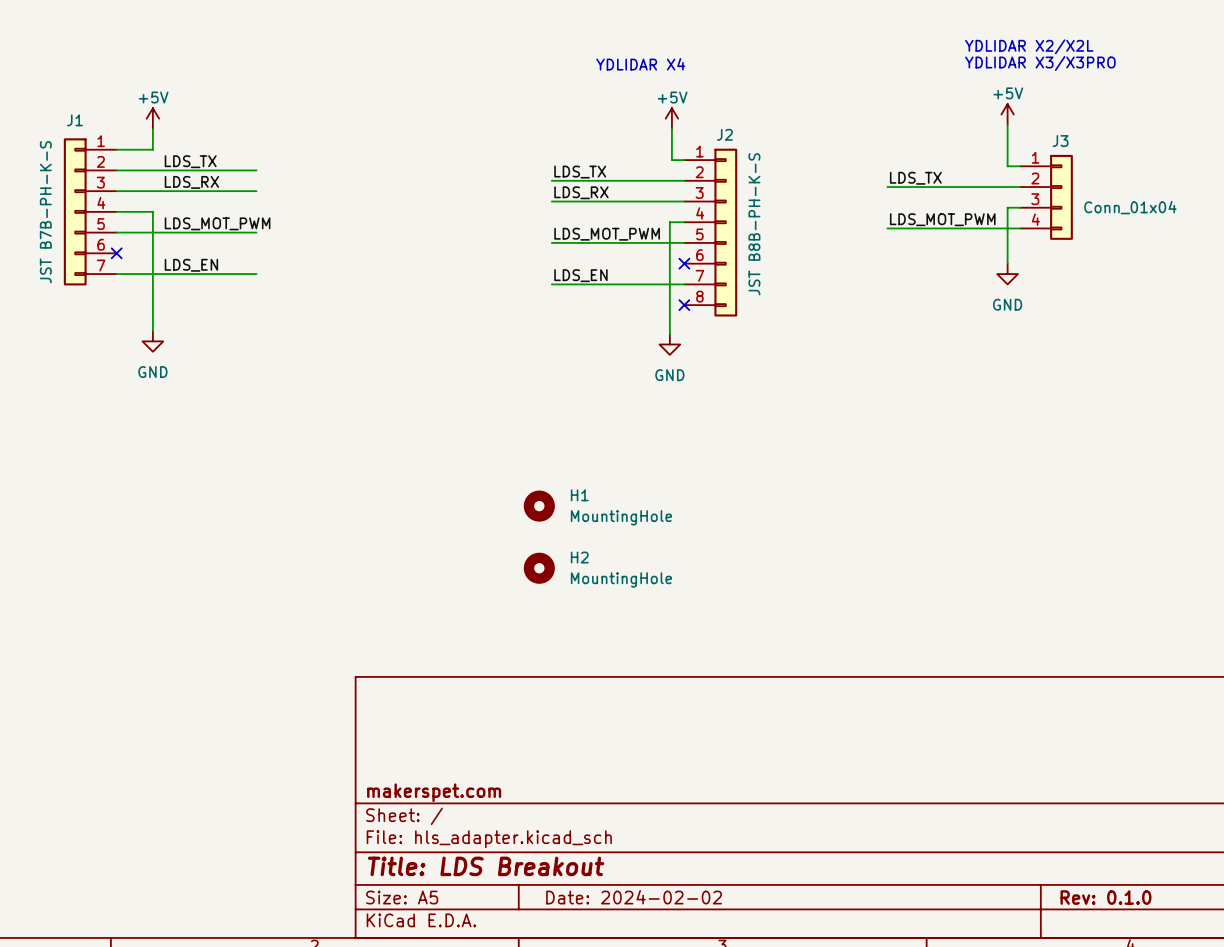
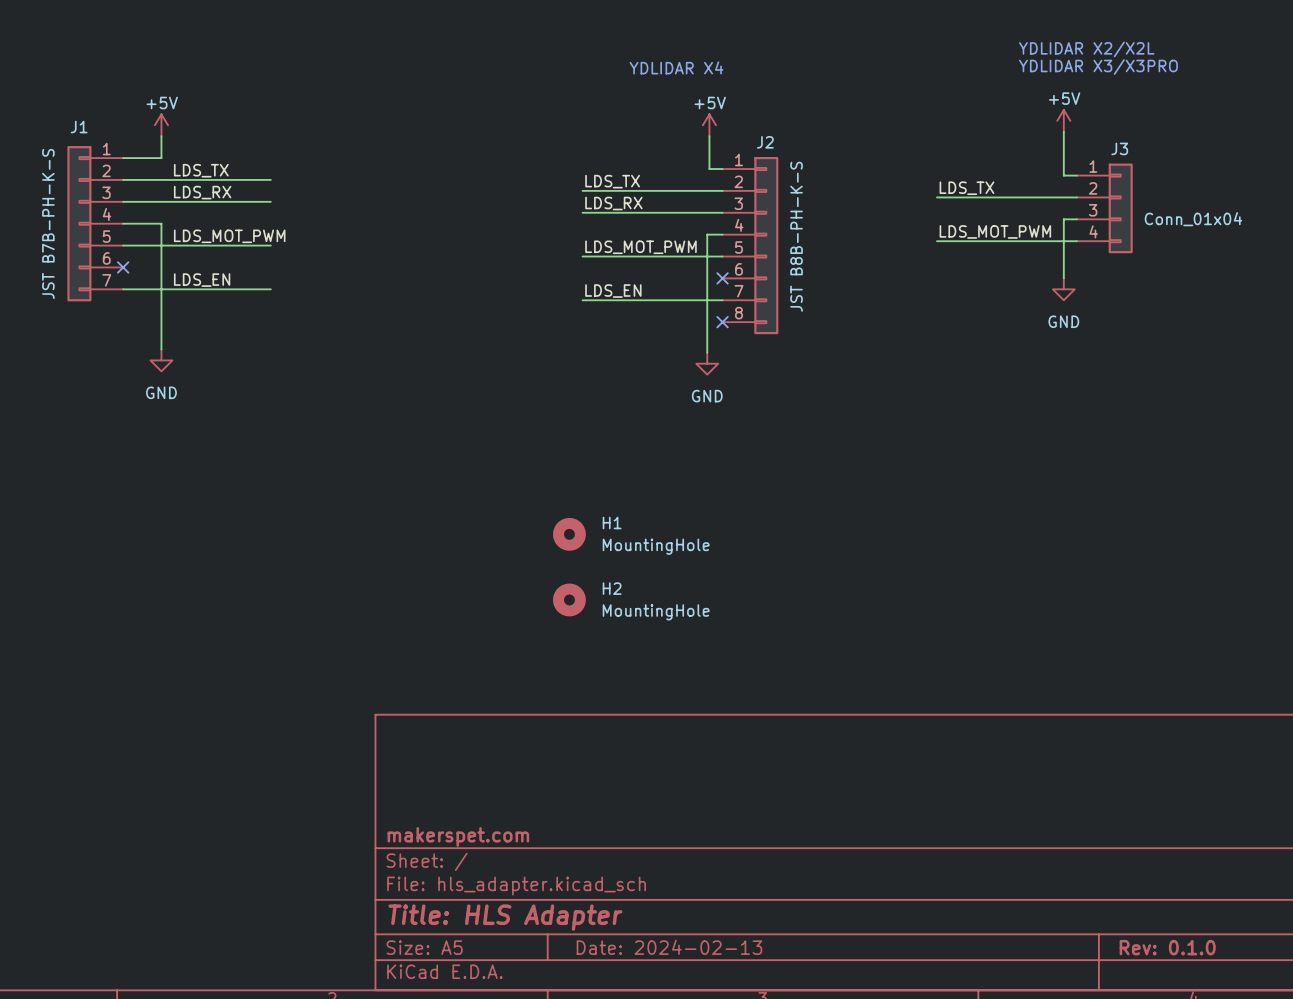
title block: Title: LDS Breakout (486, 866) -> Title: HLS Adapter (505, 917)
title block: Date: 2024-02-02 (634, 897) -> Date: 2024-02-13 (669, 947)

